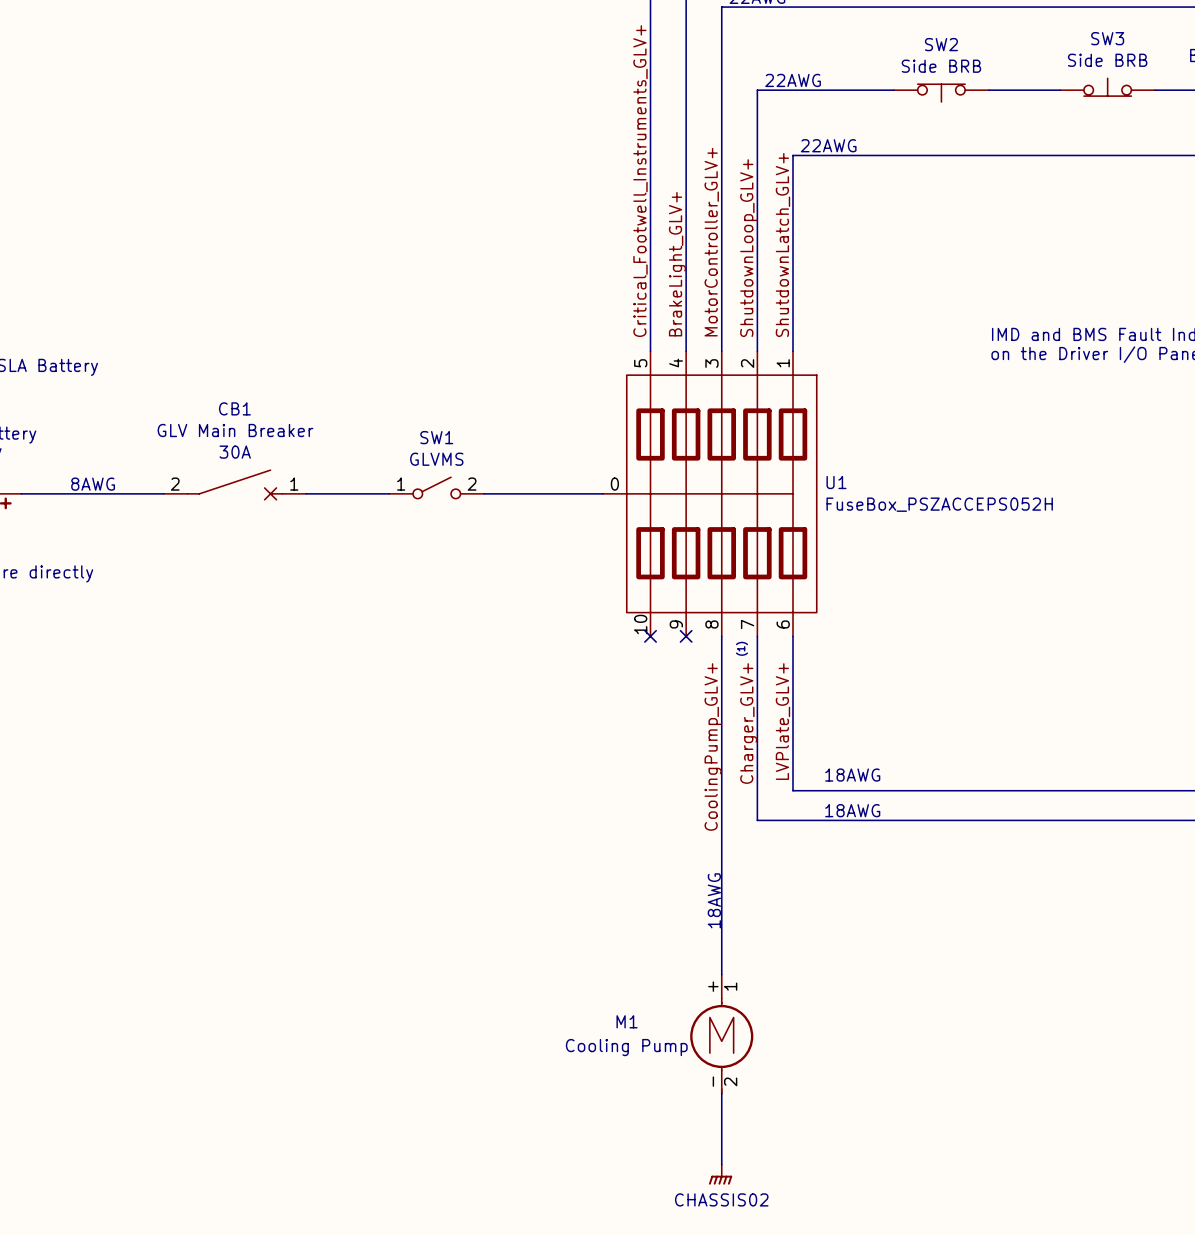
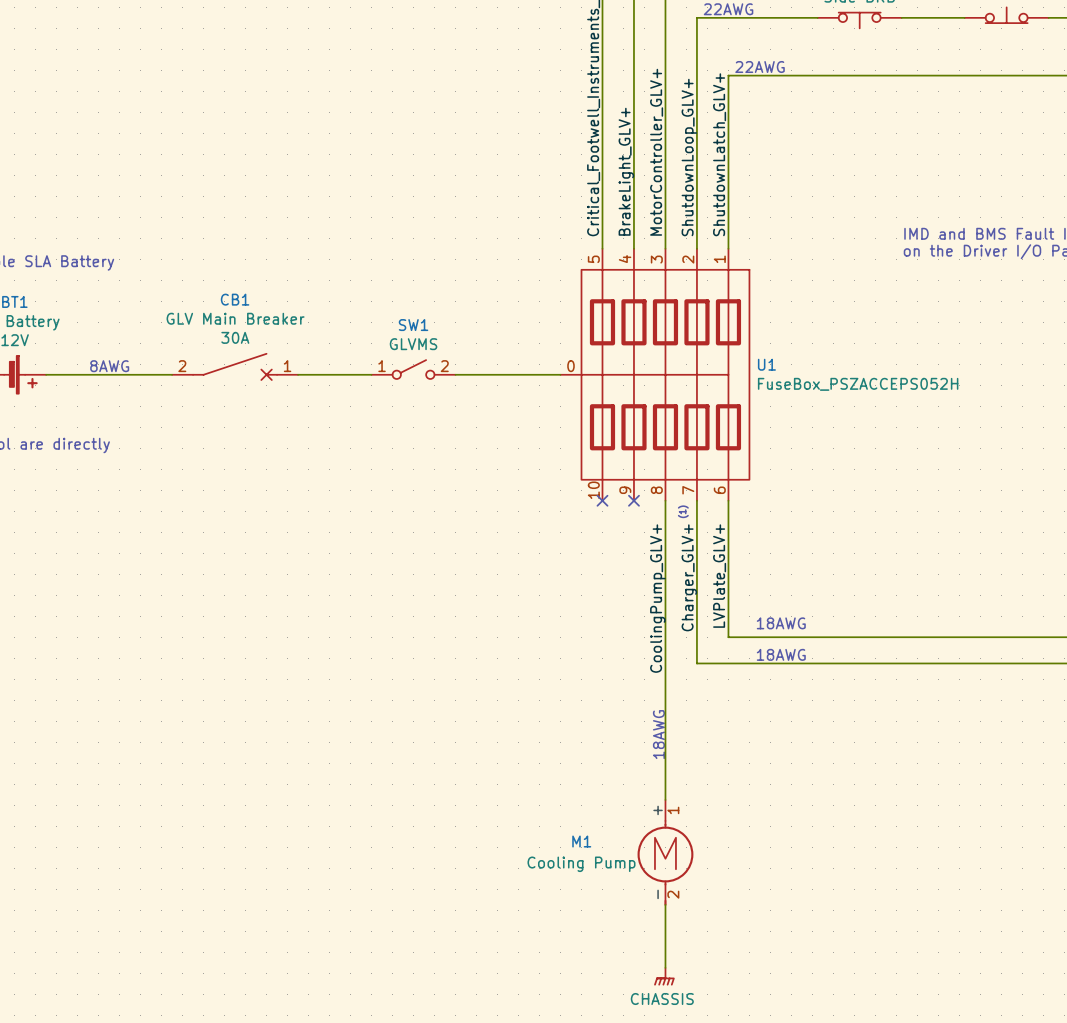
part: none -> CHASSIS (664, 976)
CHASSIS02: (720, 1174) -> none

